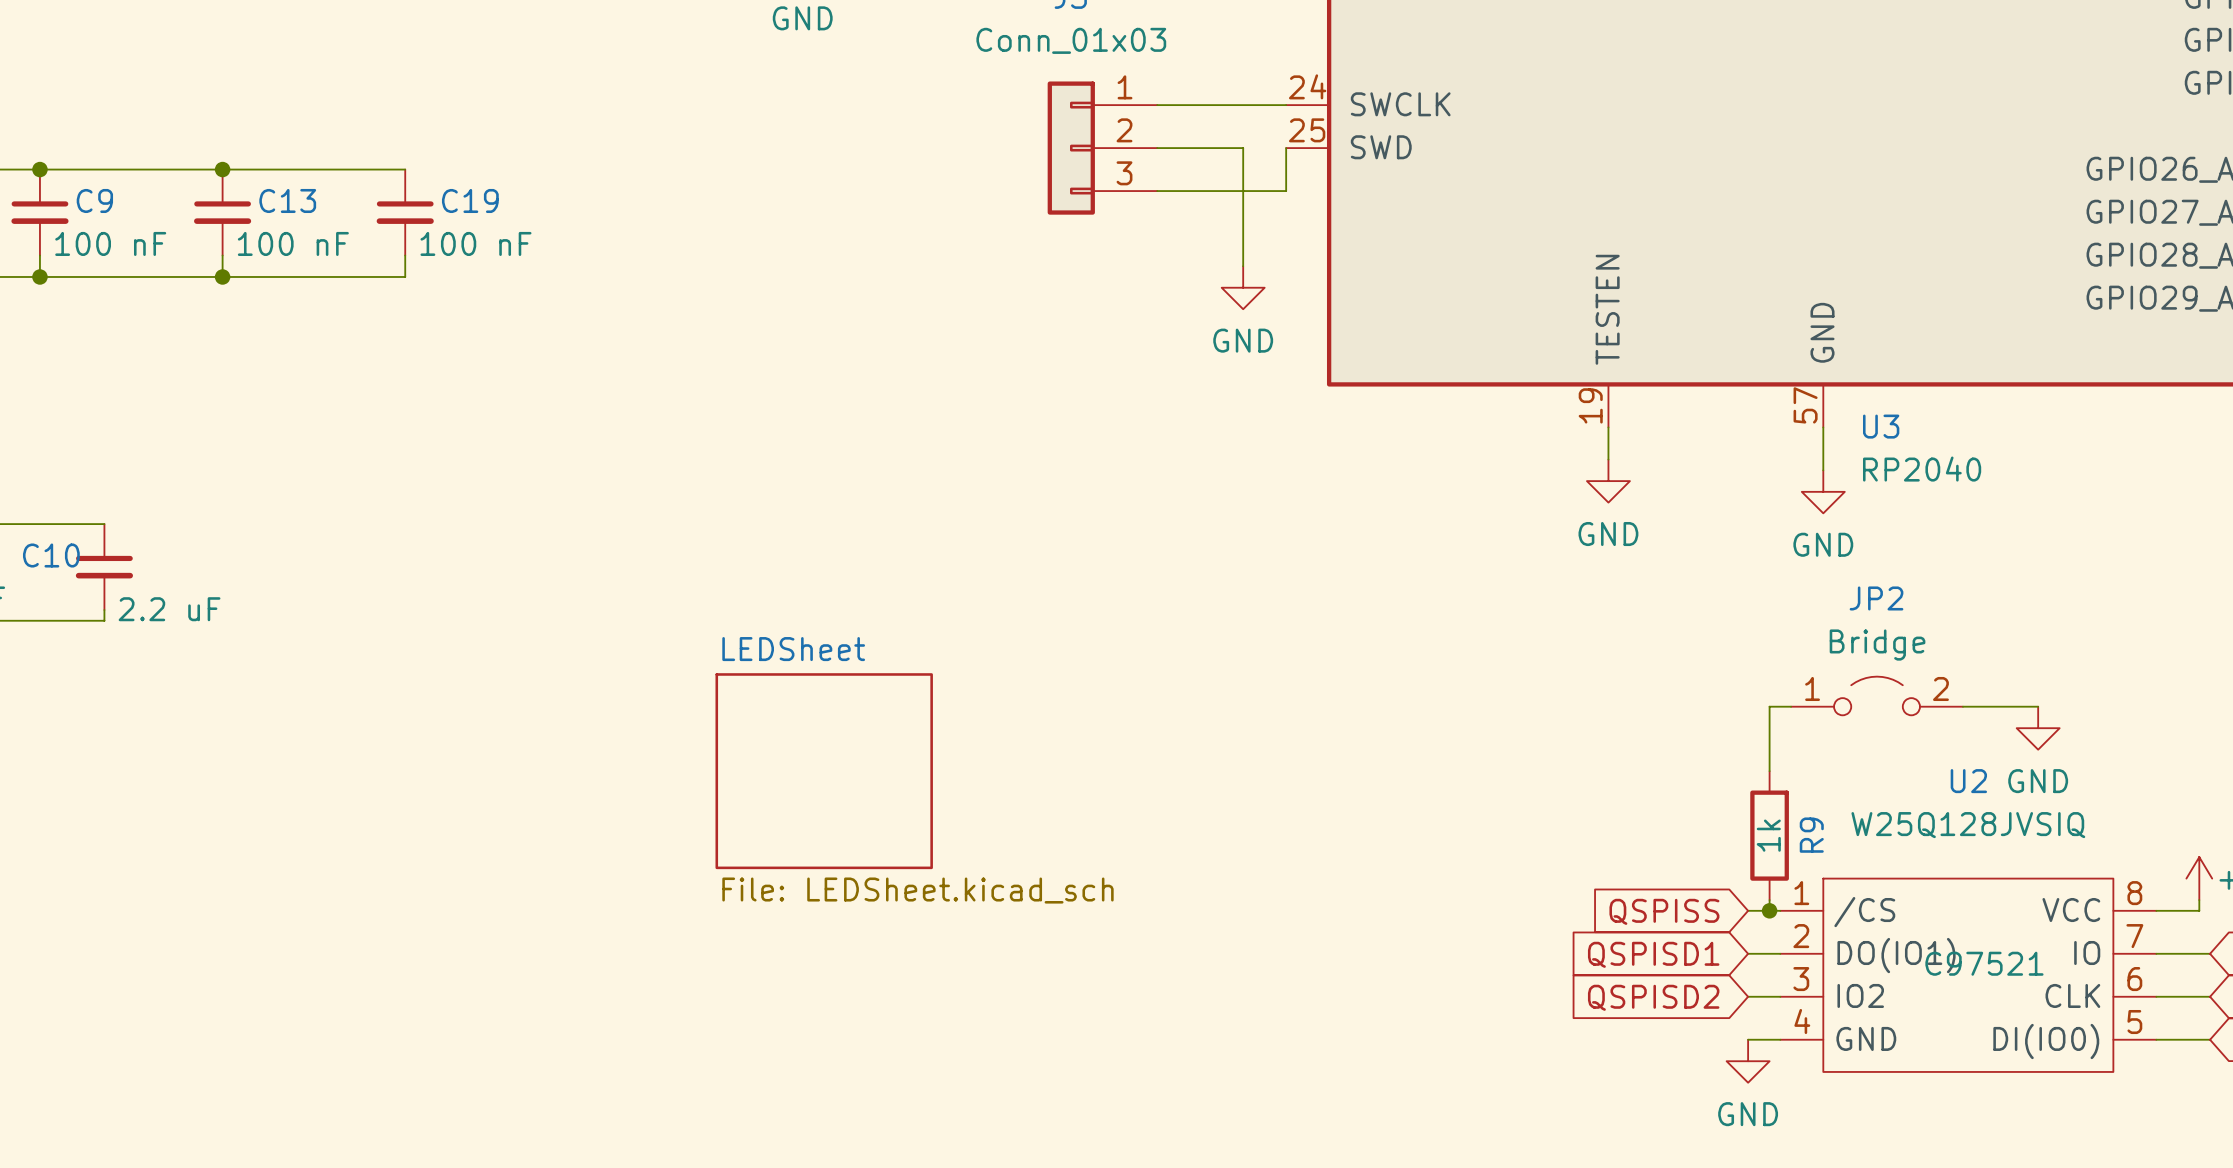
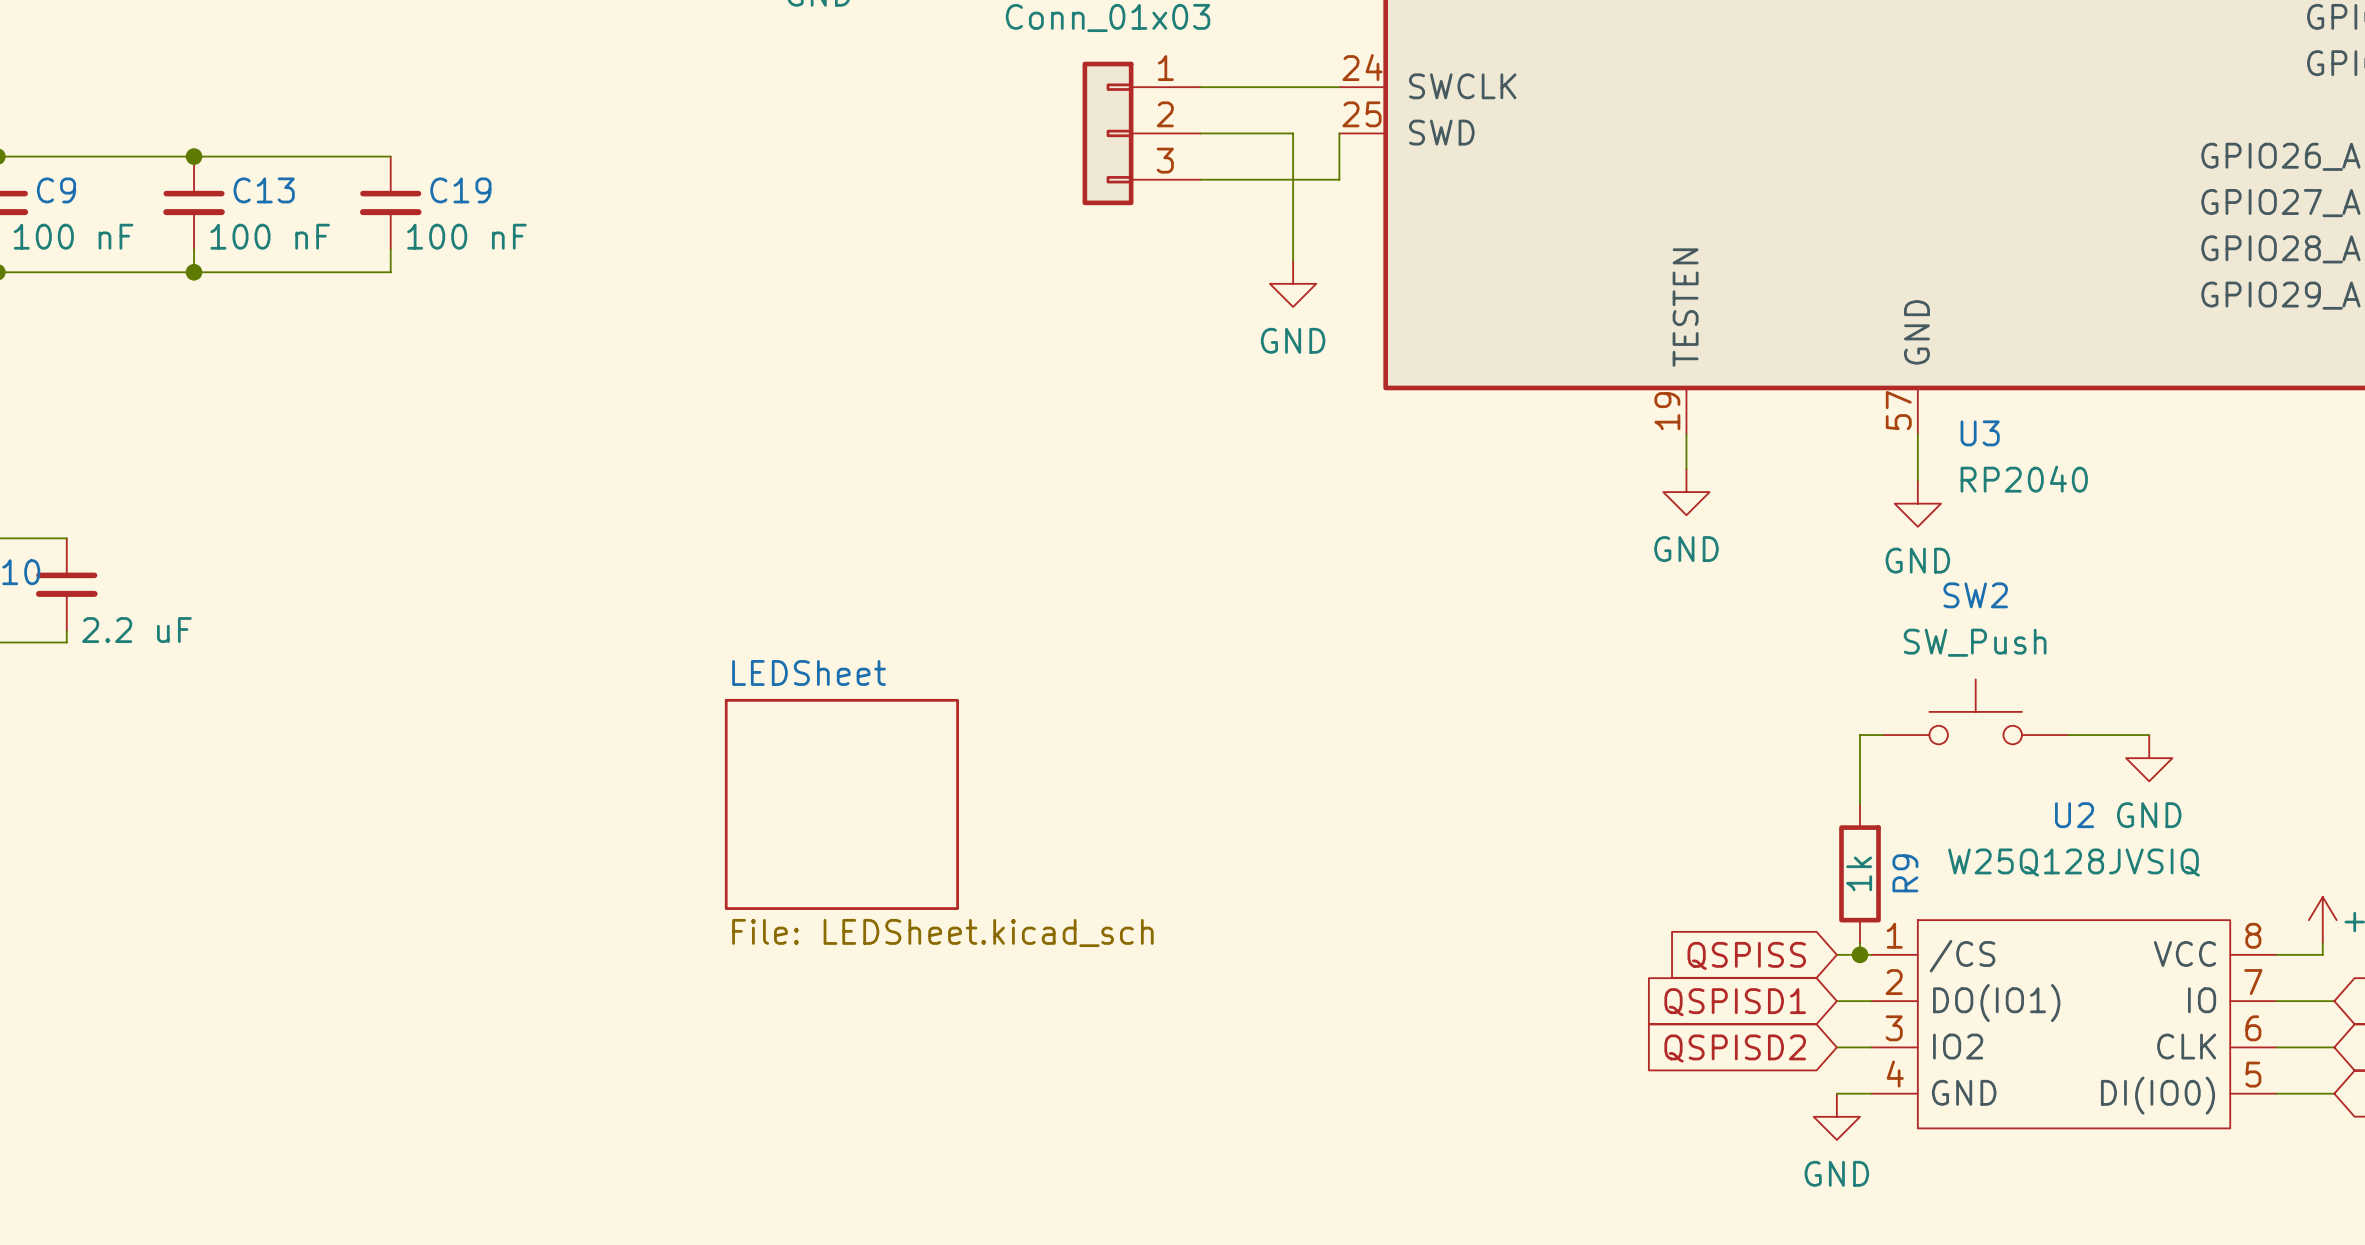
SW2: none -> SW_Push (1975, 711)
JP2: Bridge (1877, 695) -> none
U2 text: C97521 (1984, 963) -> none

